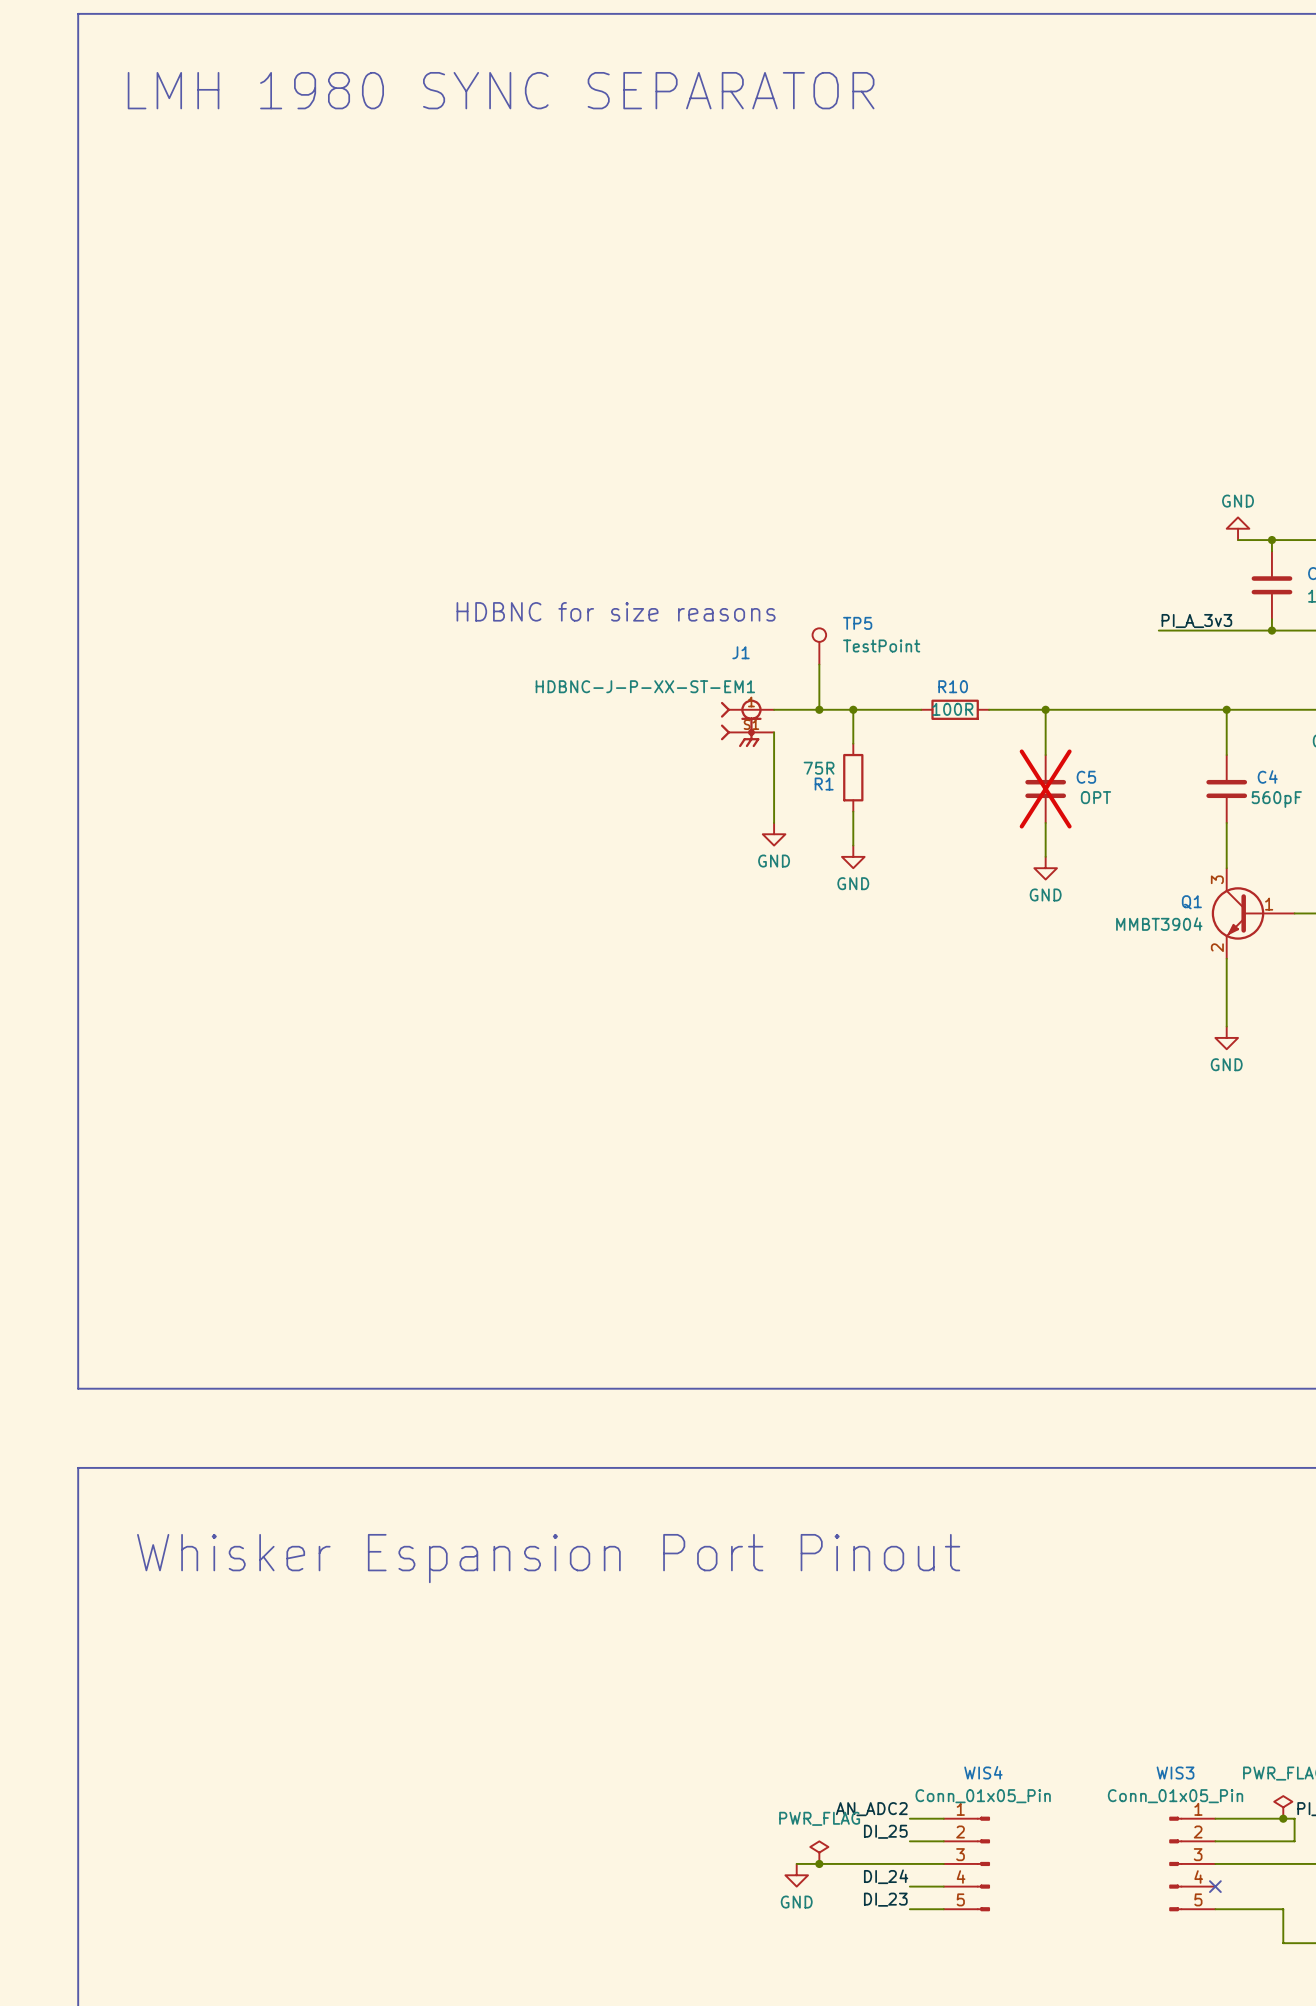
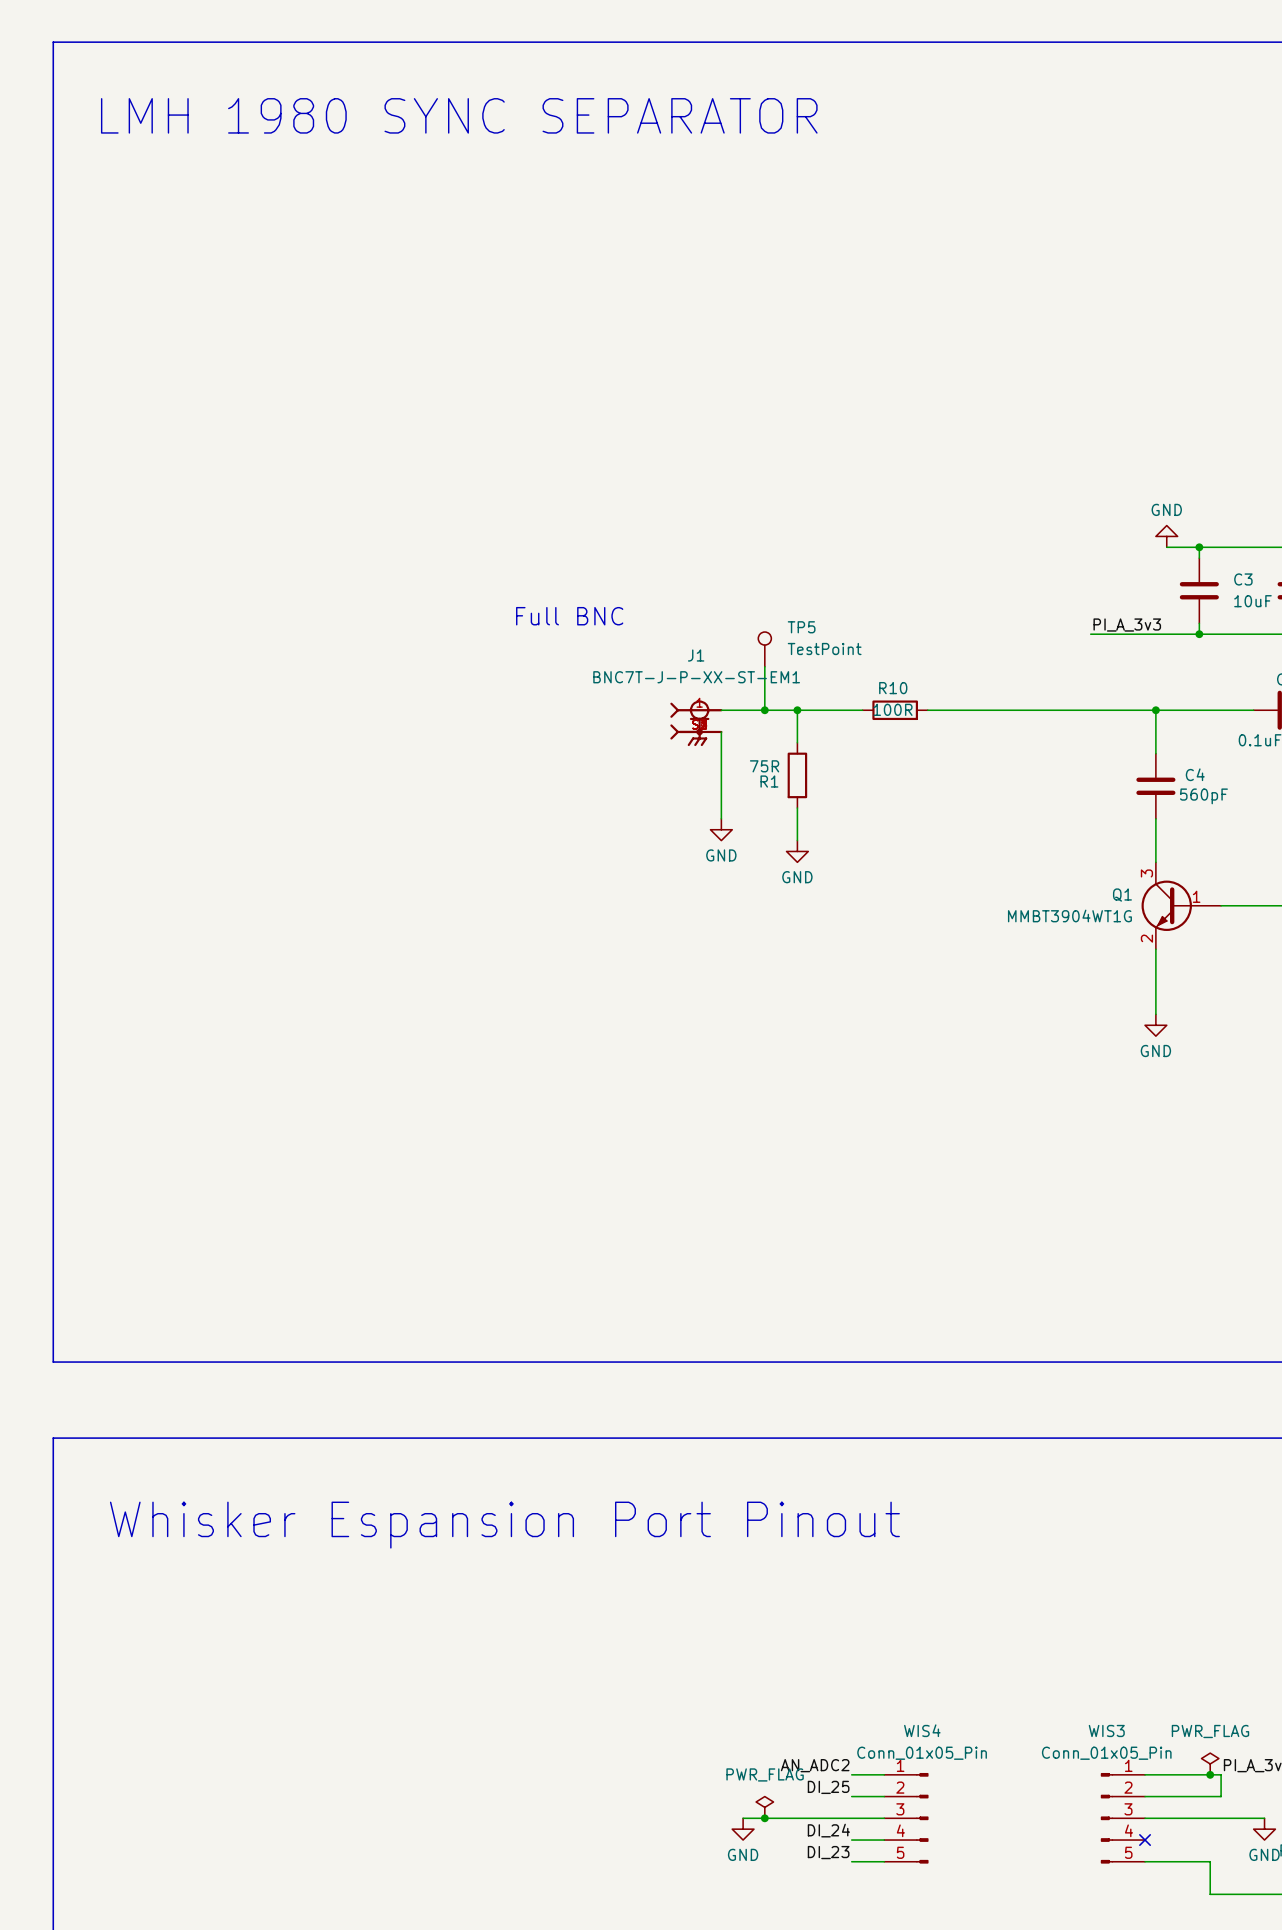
text: HDBNC for size reasons (616, 611) -> Full BNC (569, 616)
J1 value: HDBNC-J-P-XX-ST-EM1 (645, 686) -> BNC7T-J-P-XX-ST-EM1 (696, 677)
J1 symbol: [720, 699, 775, 748] -> [670, 700, 723, 747]
wire: (1045, 709) (1045, 755) -> none
junction: (1045, 709) -> none
C5: OPT (1045, 788) -> none
wire: (1045, 822) (1045, 856) -> none
power symbol: GND (1045, 868) -> none
Q1 value: MMBT3904 (1159, 924) -> MMBT3904WT1G (1069, 915)

